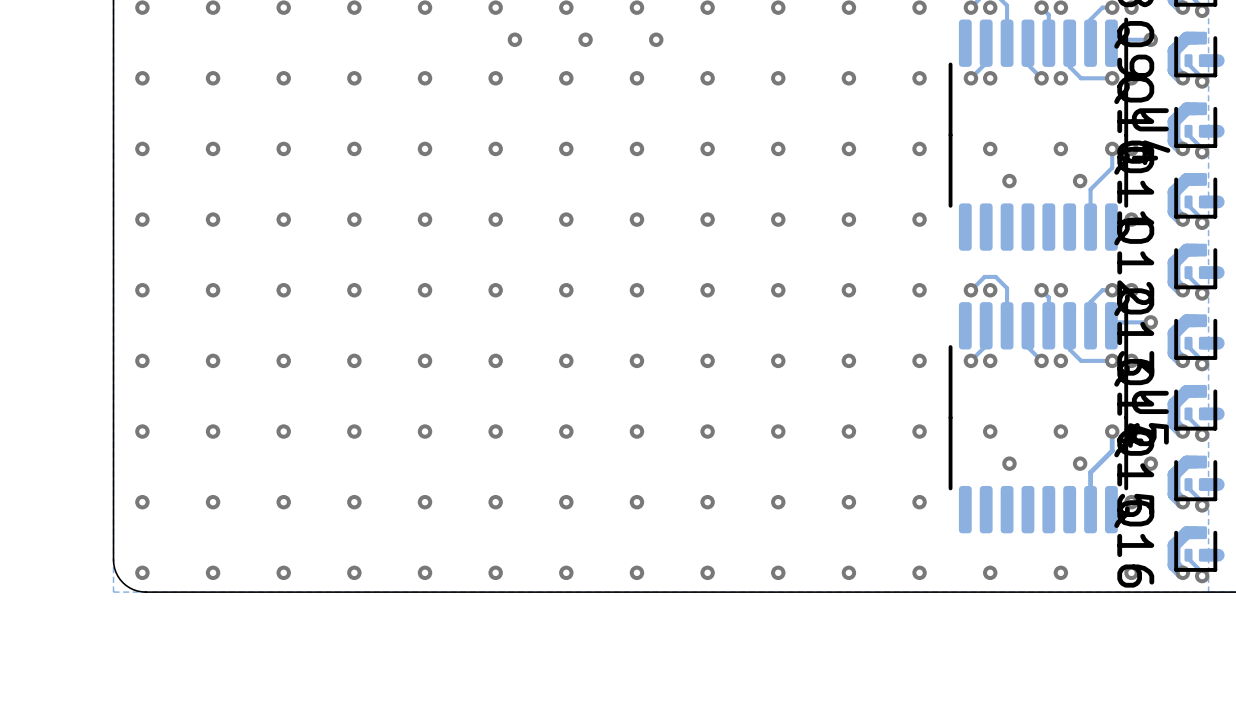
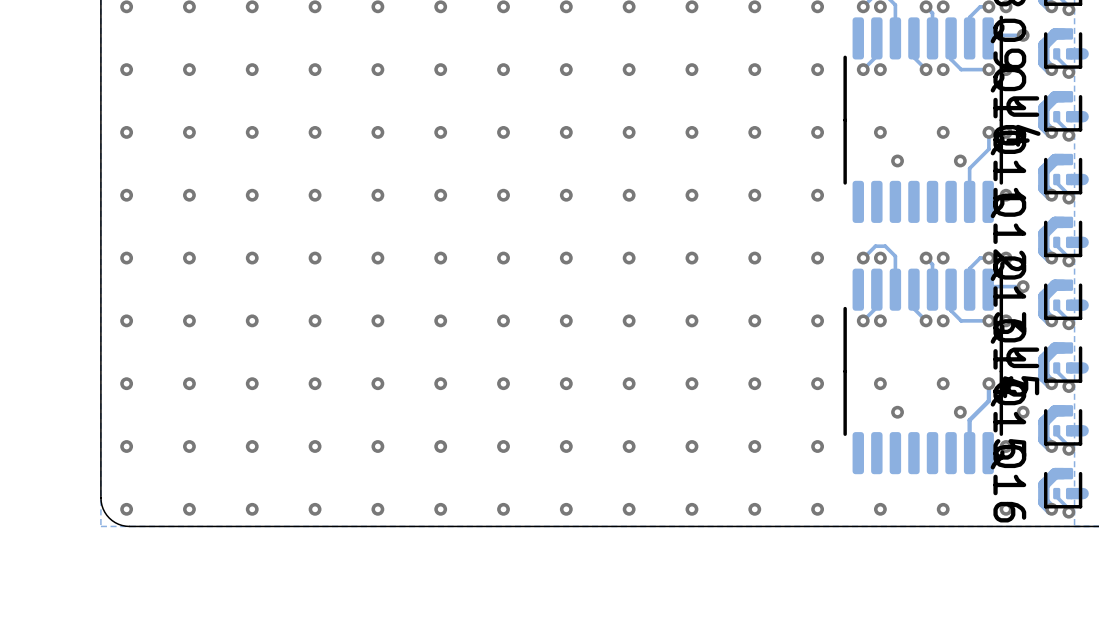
via: (514, 39) -> none
via: (585, 39) -> none
via: (656, 39) -> none

